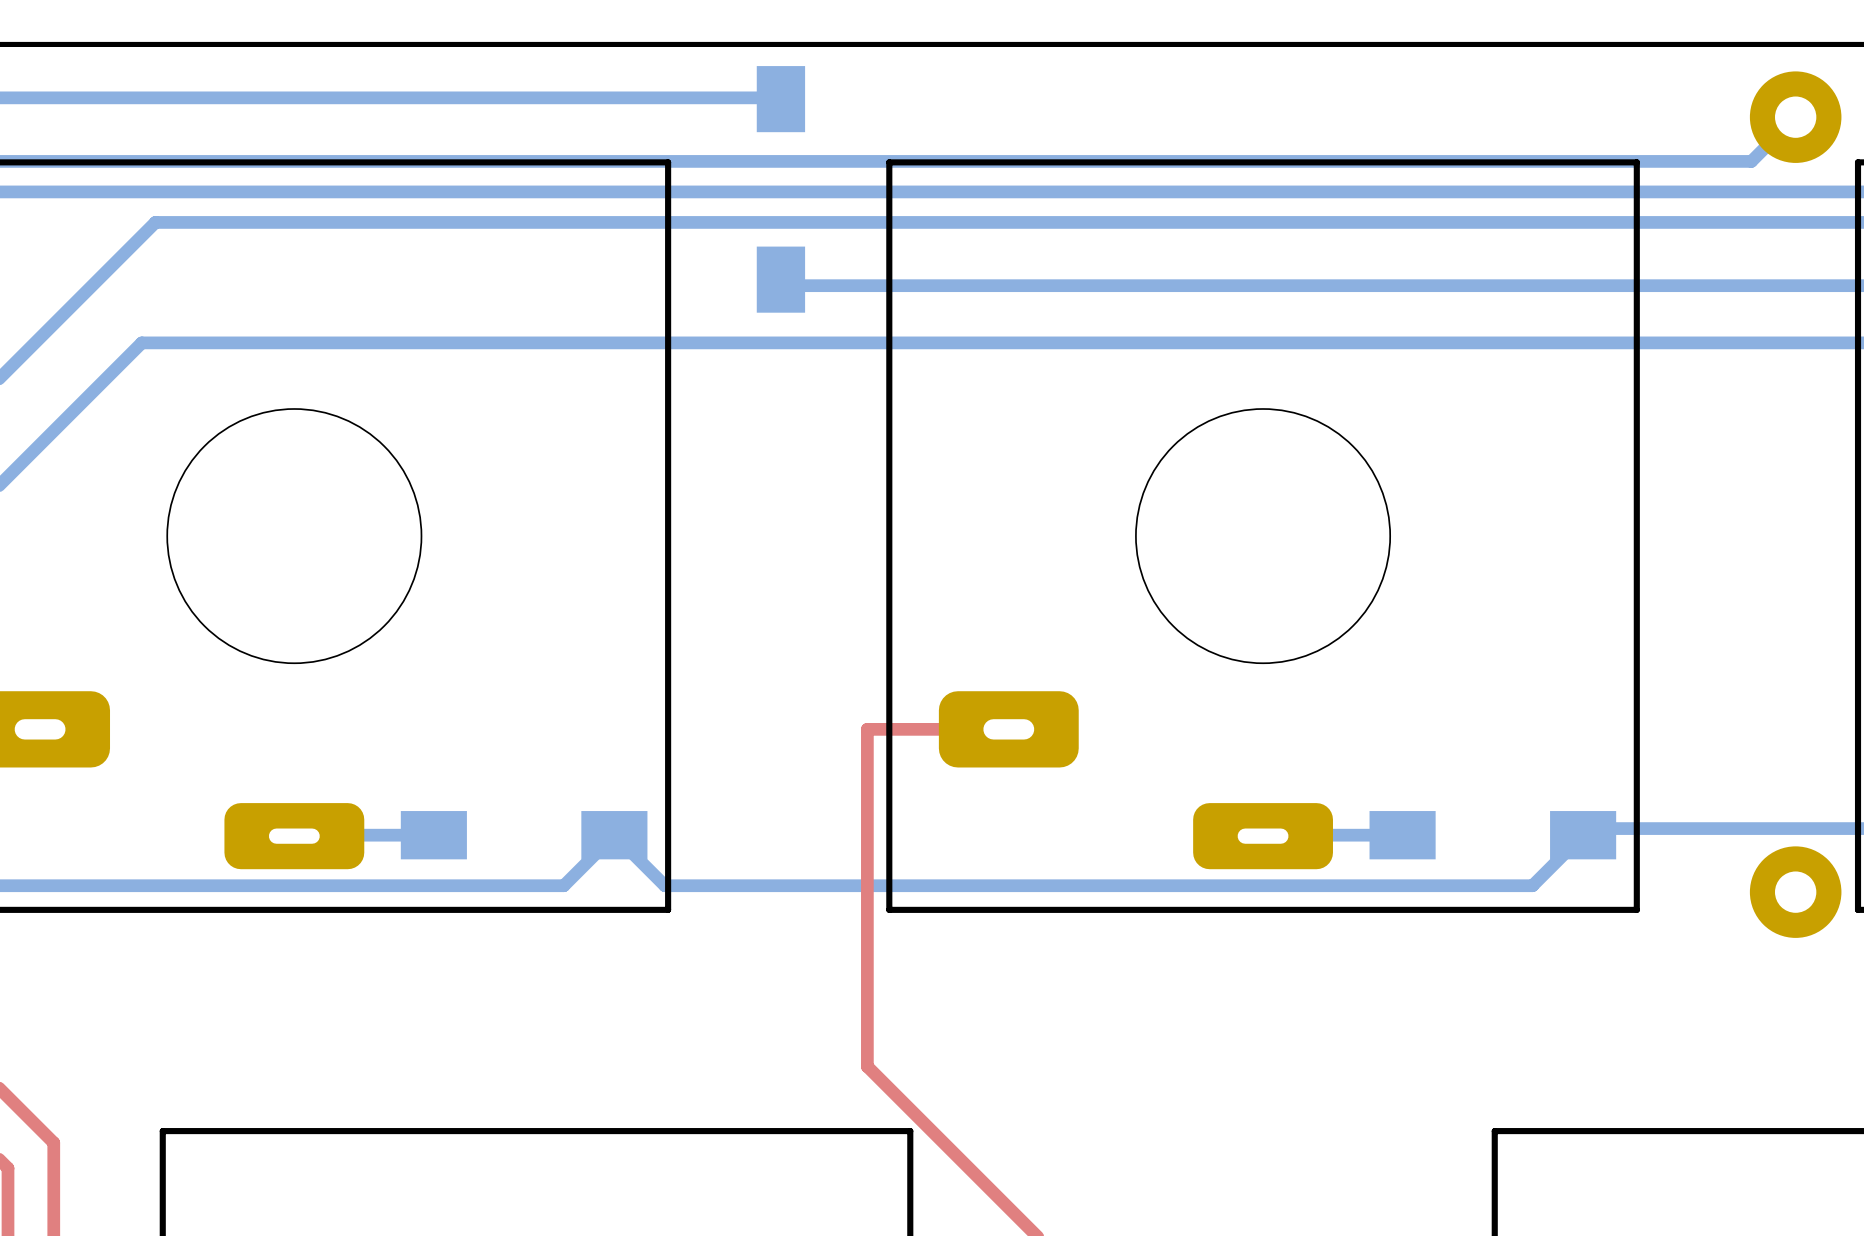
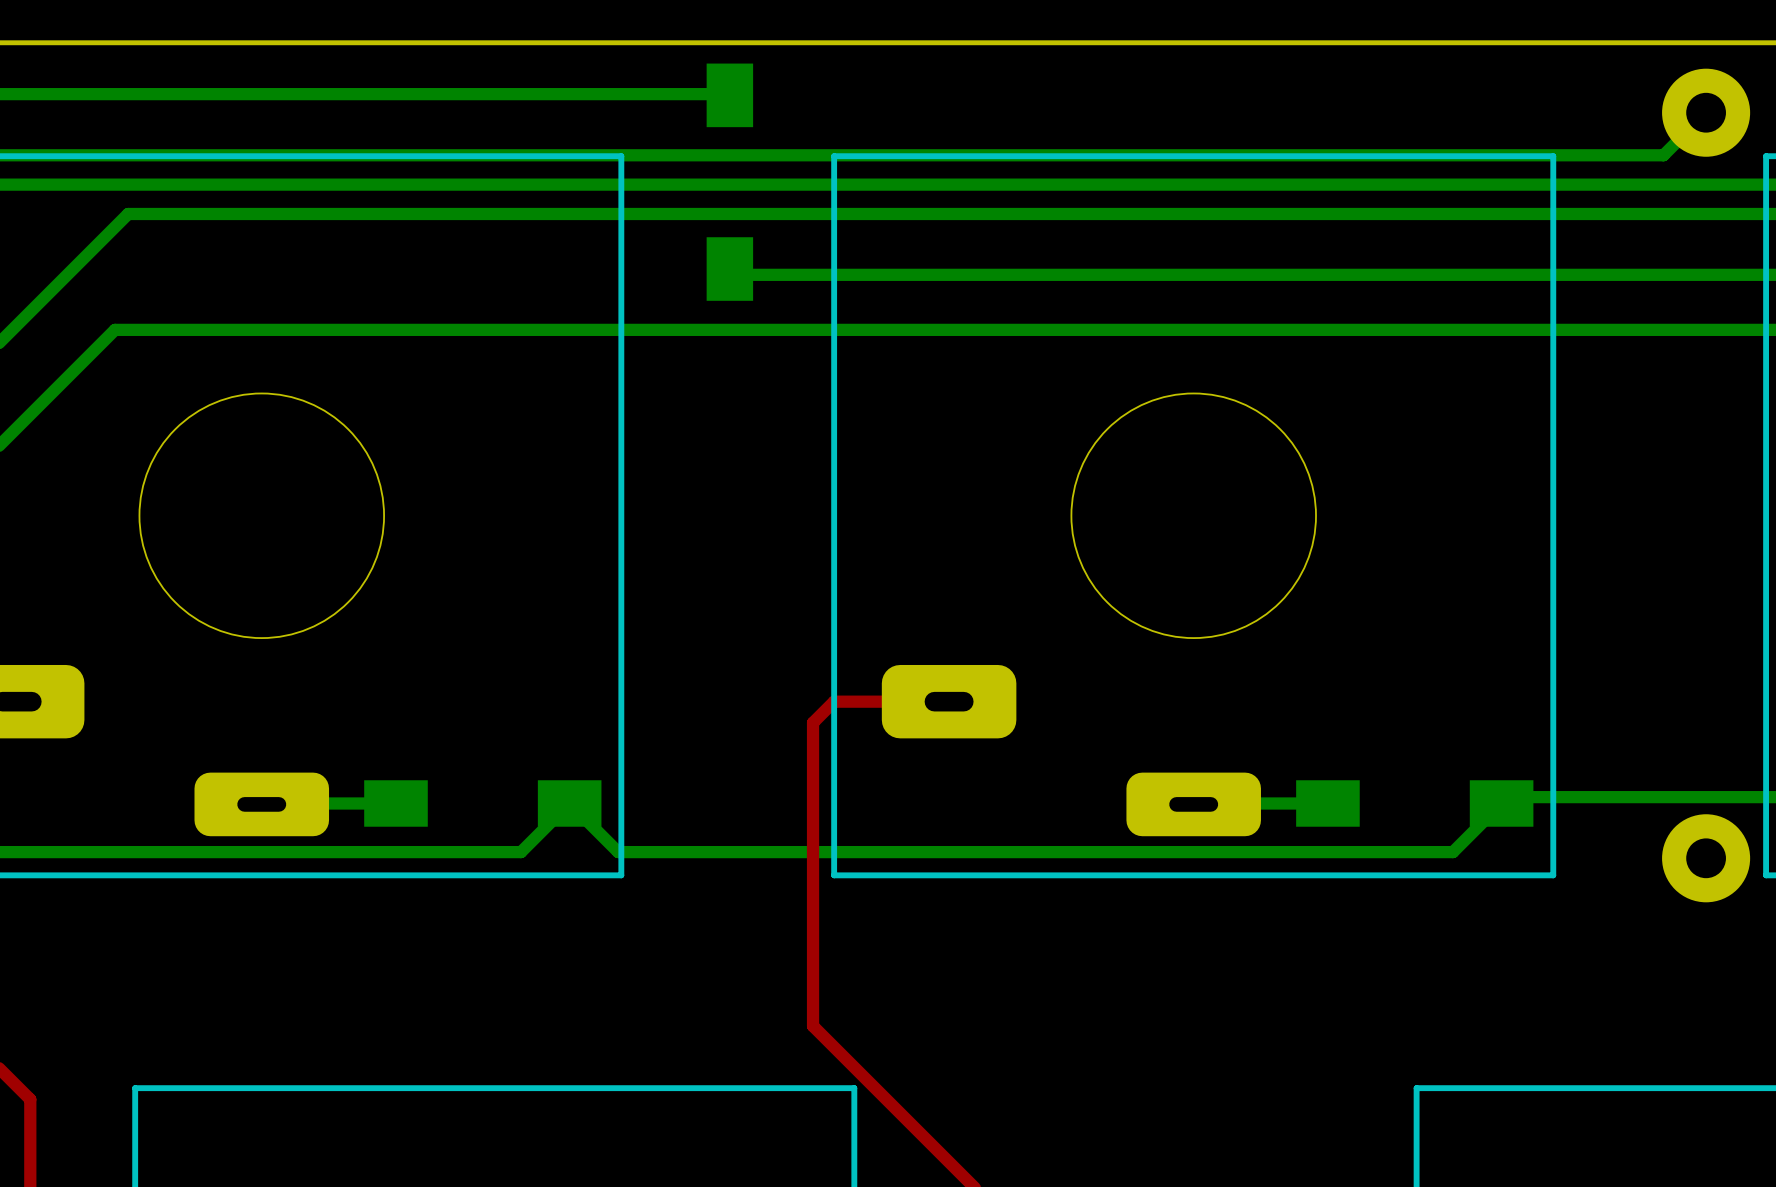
top track: (889, 729) (867, 729) (867, 751) -> (834, 701) (813, 722)

